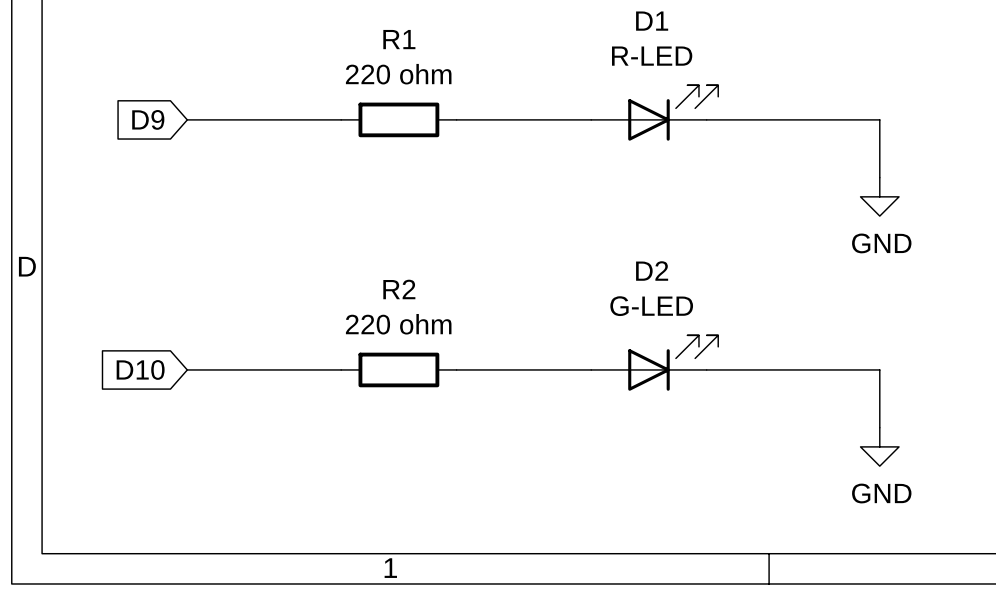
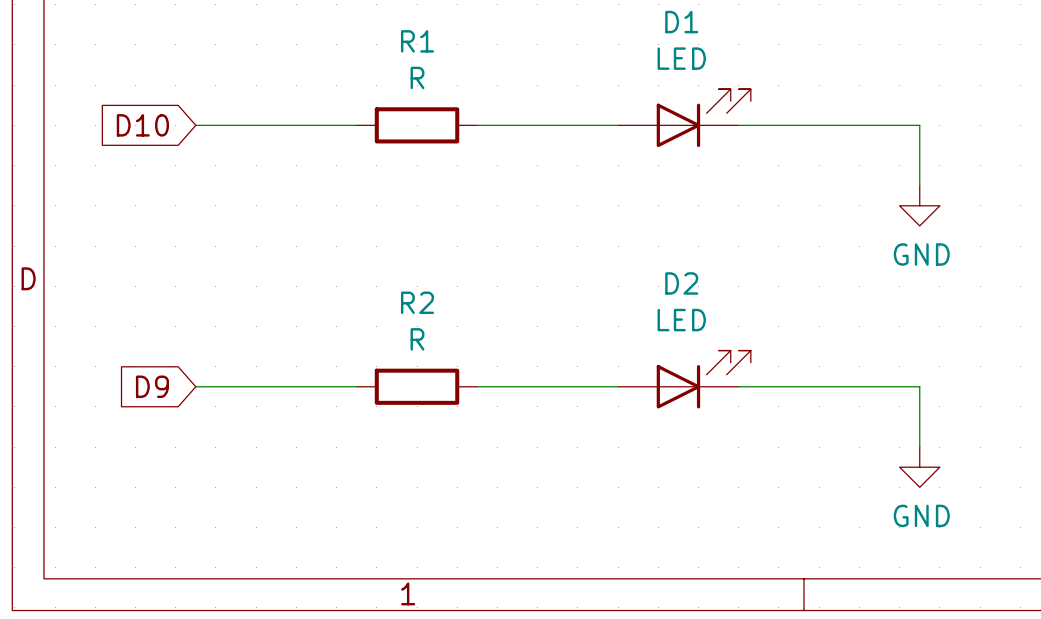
D1 value: R-LED (652, 56) -> LED (681, 58)
R1 value: 220 ohm (398, 74) -> R (417, 77)
global label: D9 (148, 119) -> D10 (142, 125)
D2 value: G-LED (651, 306) -> LED (681, 320)
R2 value: 220 ohm (398, 324) -> R (417, 339)
global label: D10 (140, 369) -> D9 (152, 386)

